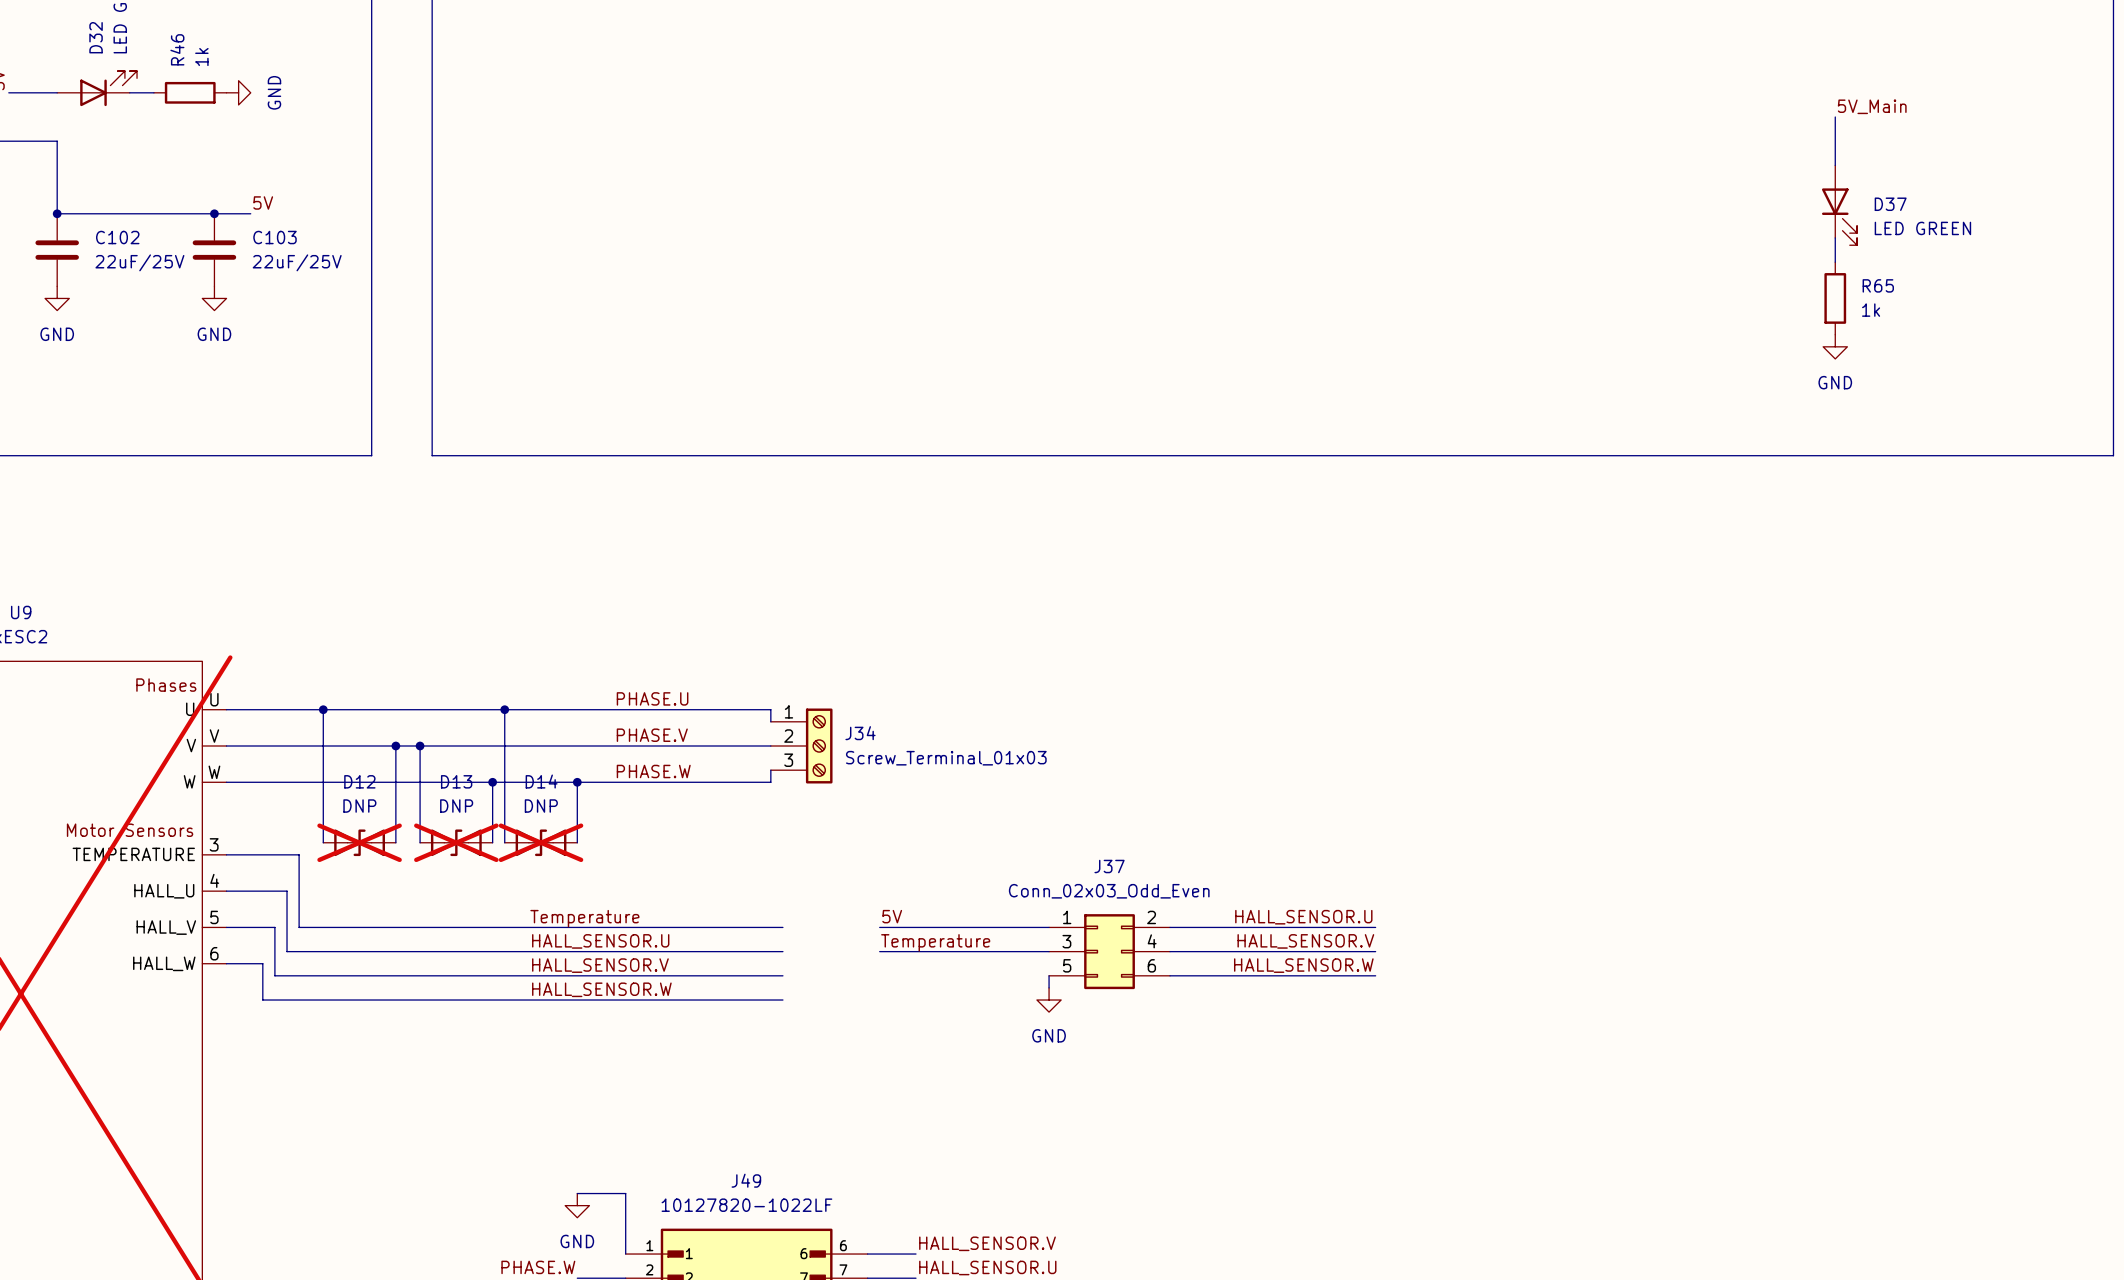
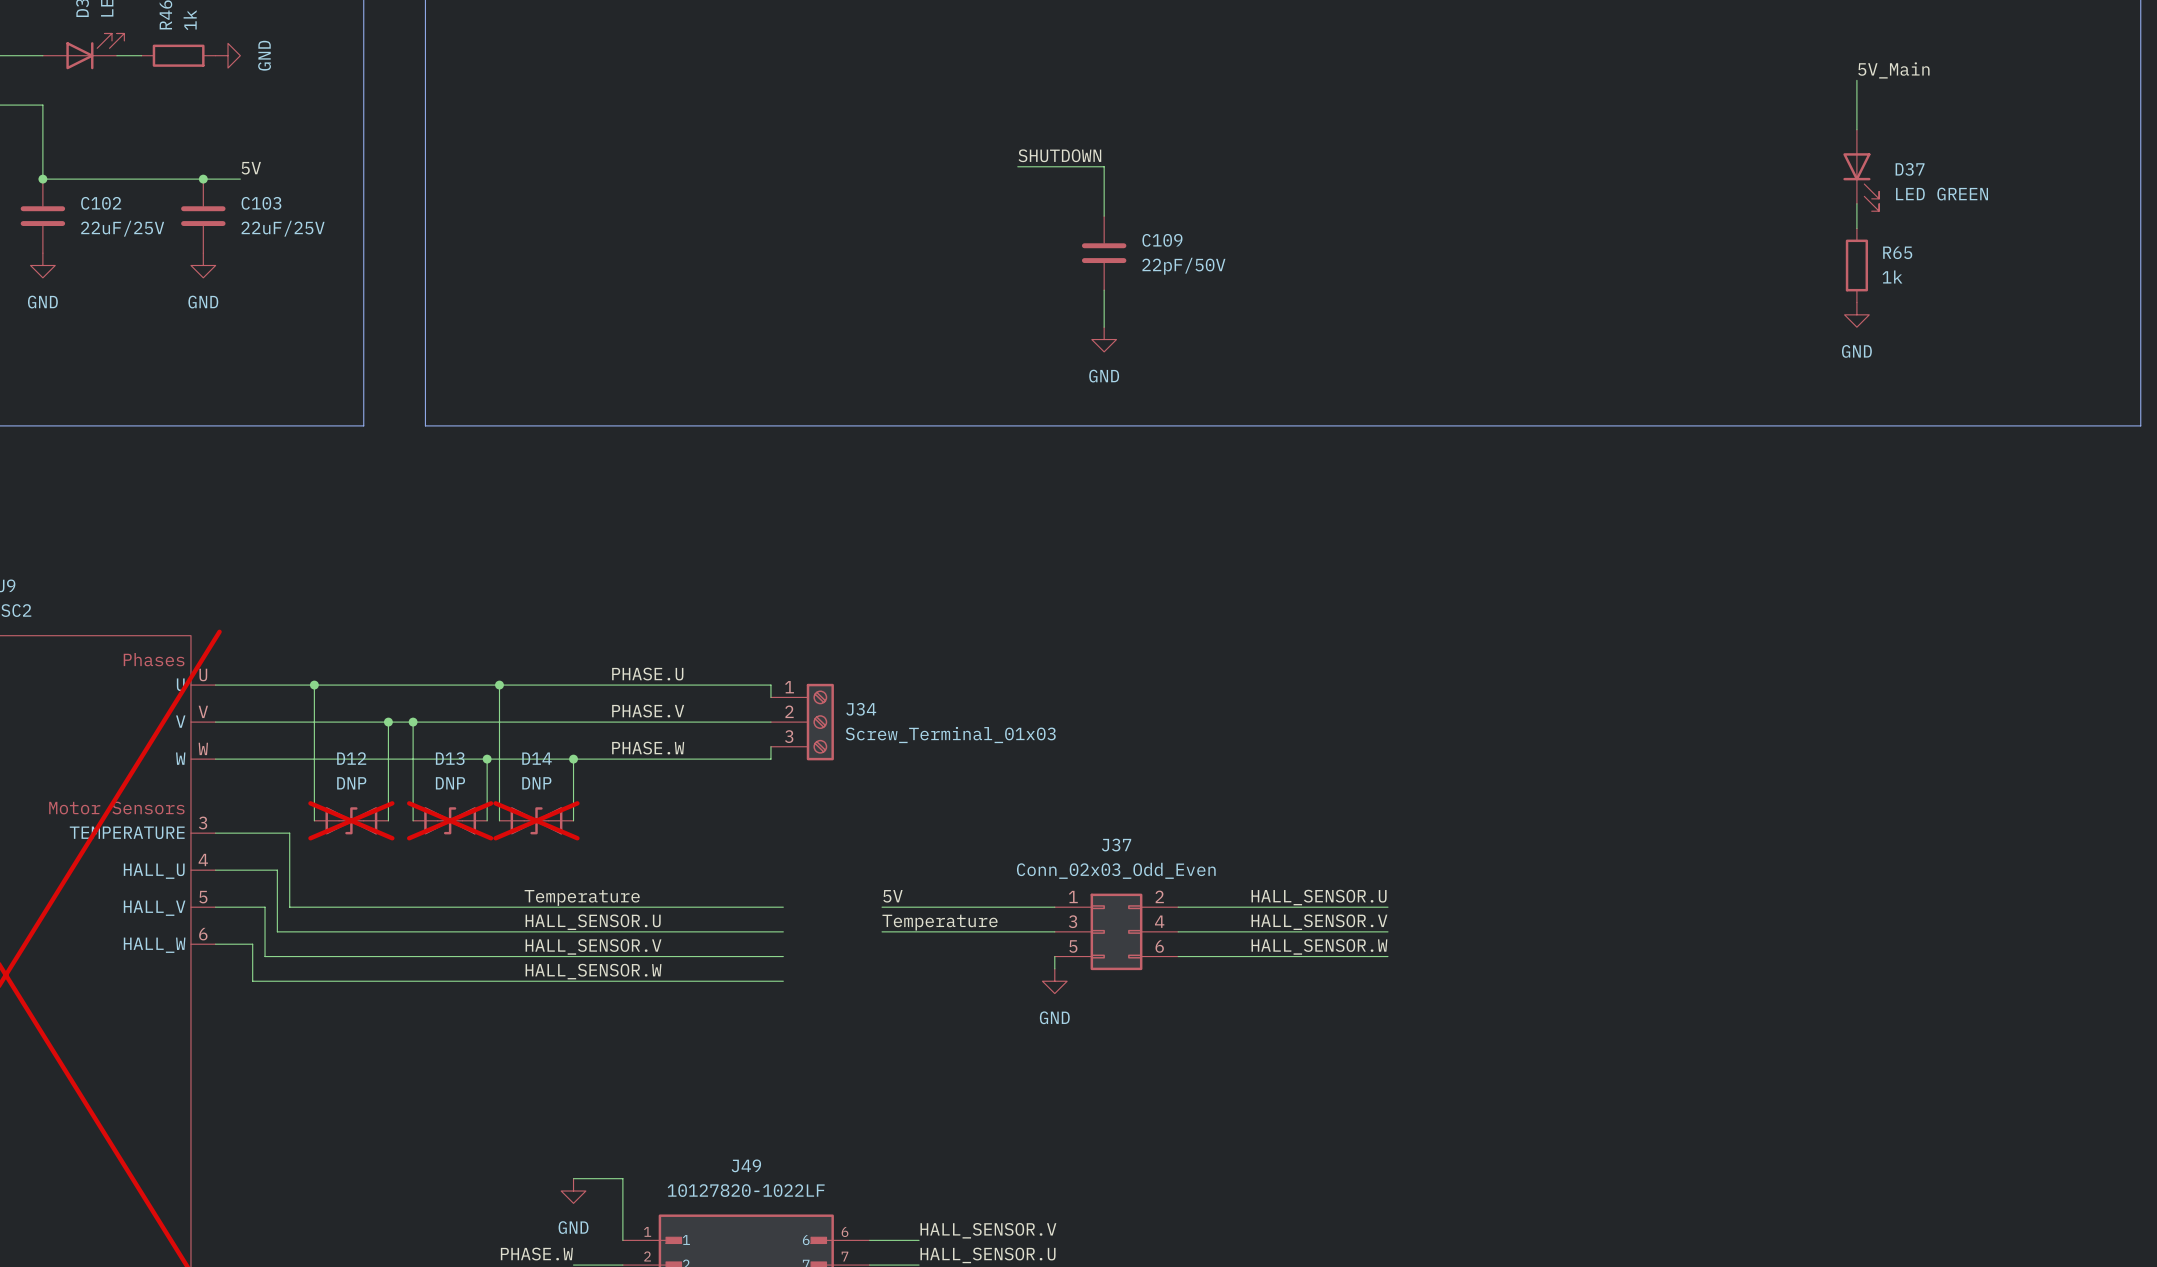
label: none -> SHUTDOWN (1059, 155)
wire: none -> (1017, 166) (1104, 166) (1104, 216)
C109: none -> 22pF/50V (1104, 253)
wire: none -> (1104, 290) (1104, 327)
power symbol: none -> GND (1104, 339)

